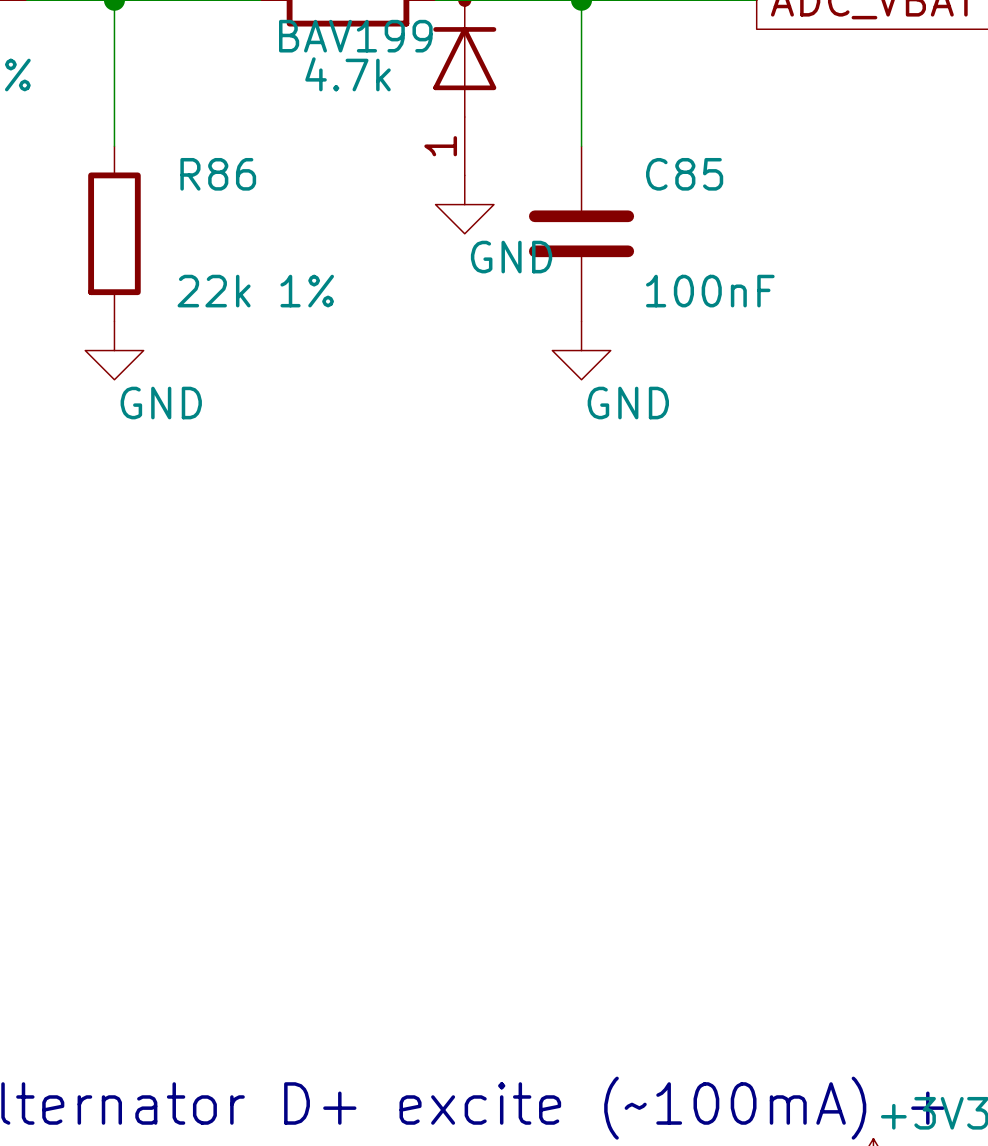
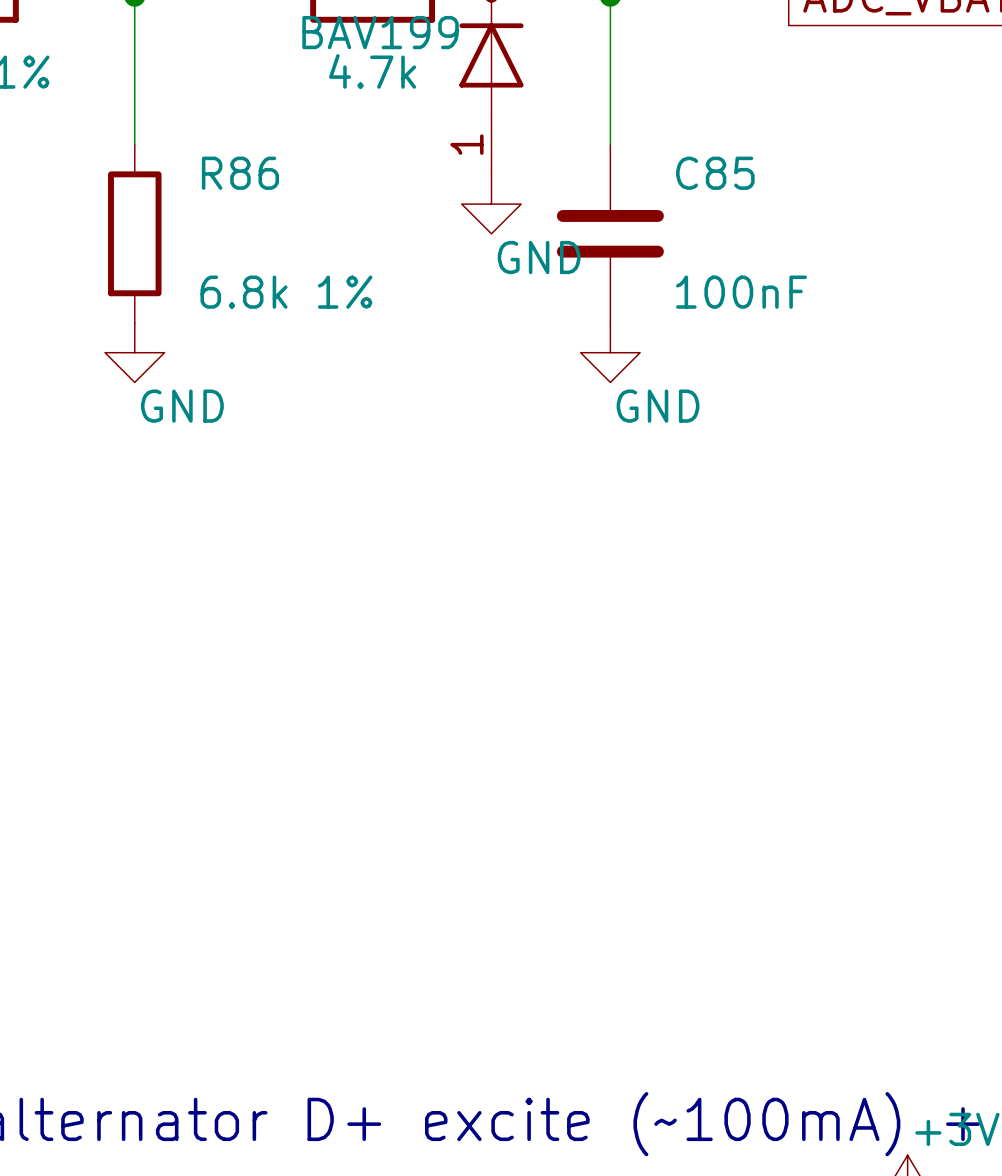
R86 value: 22k 1% (255, 291) -> 6.8k 1% (286, 292)

